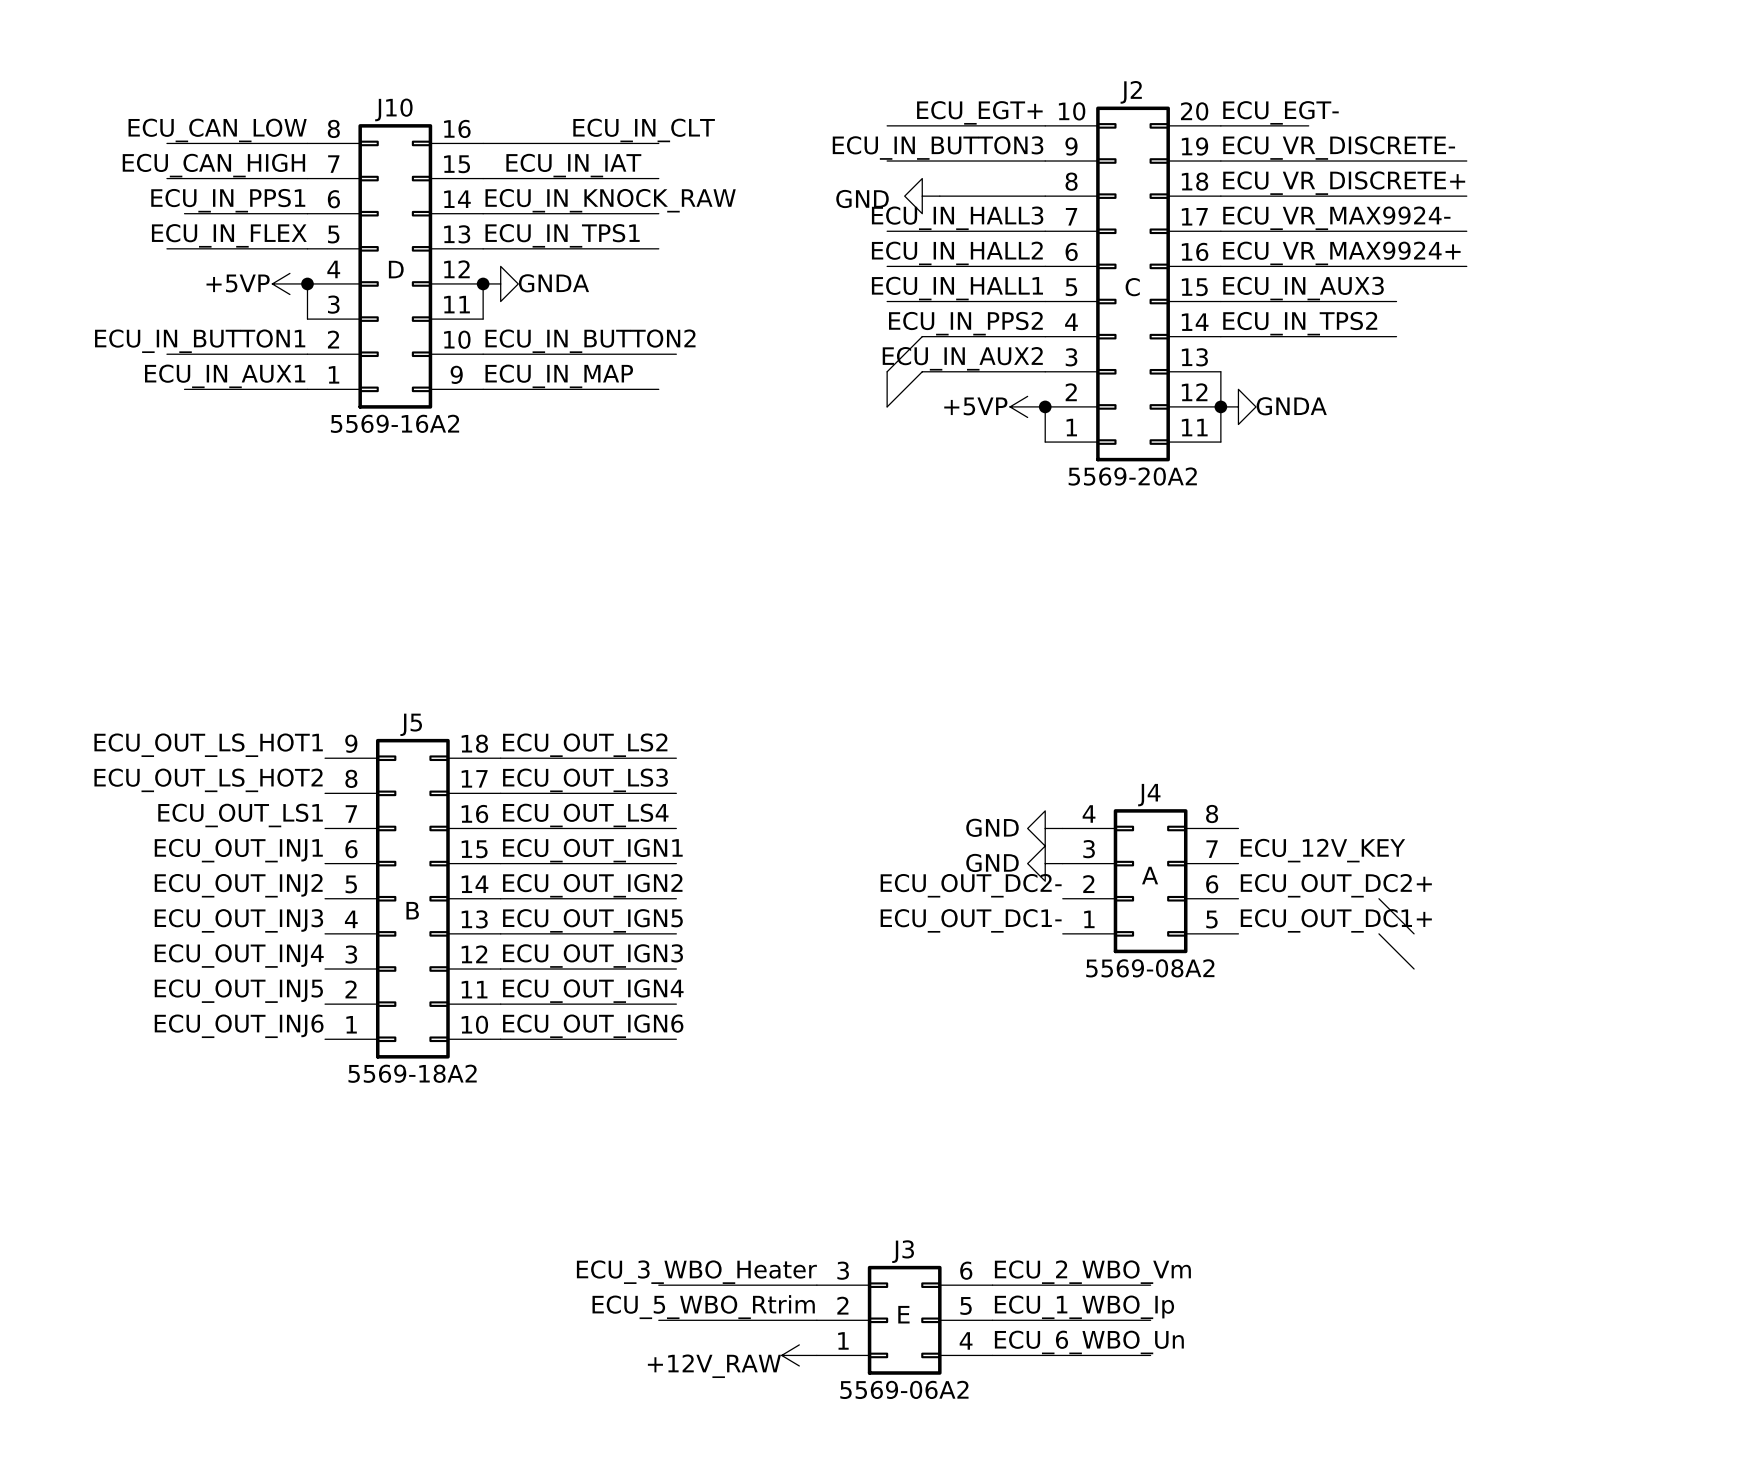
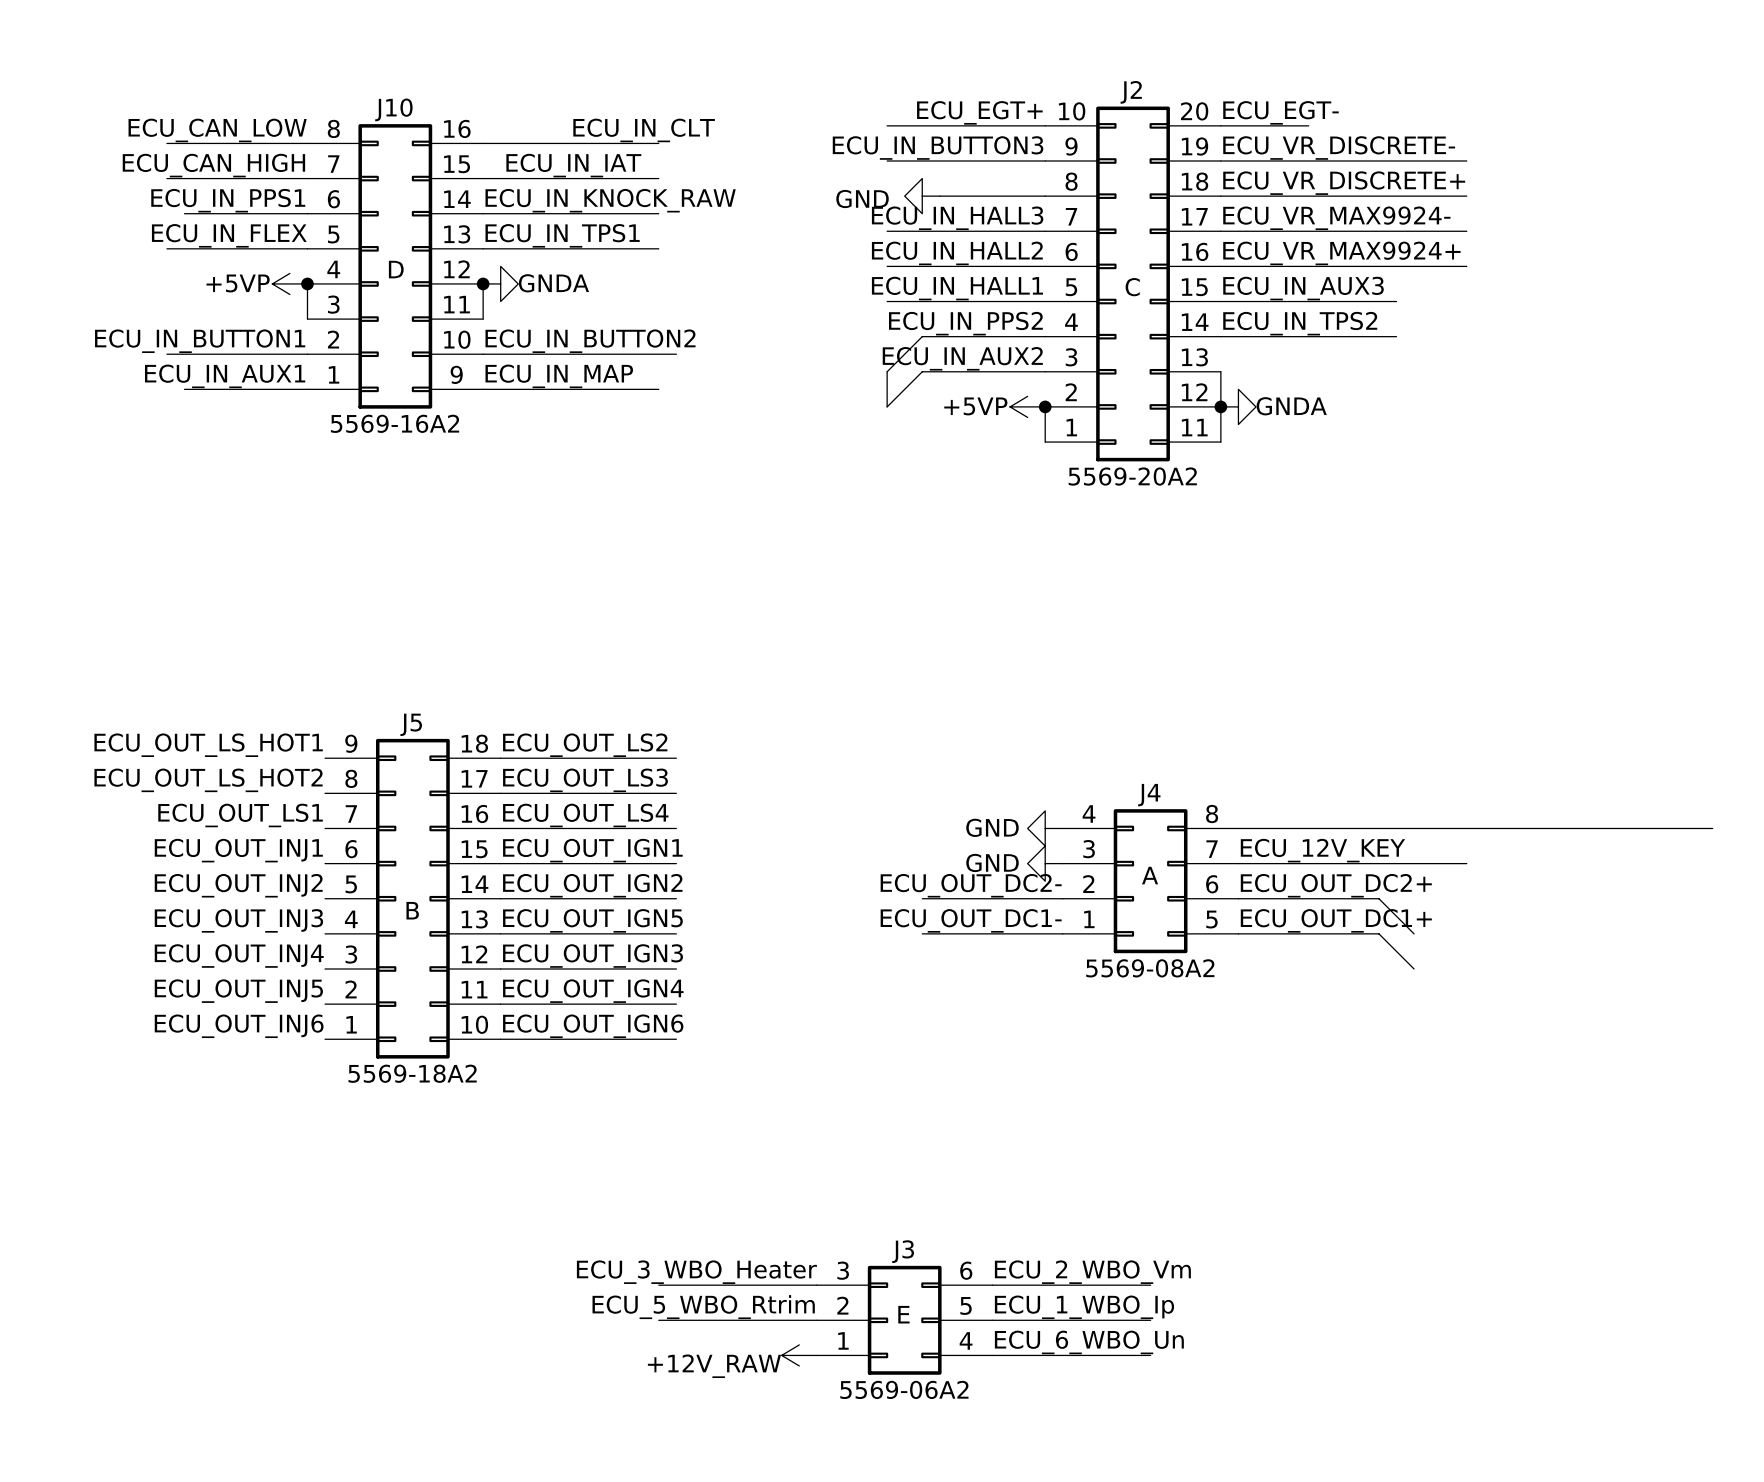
wire: none -> (1238, 828) (1712, 828)
wire: none -> (1238, 863) (1466, 863)
wire: none -> (922, 898) (1062, 898)
wire: none -> (1238, 898) (1378, 898)
wire: none -> (922, 933) (1062, 933)
wire: none -> (1238, 933) (1378, 933)

